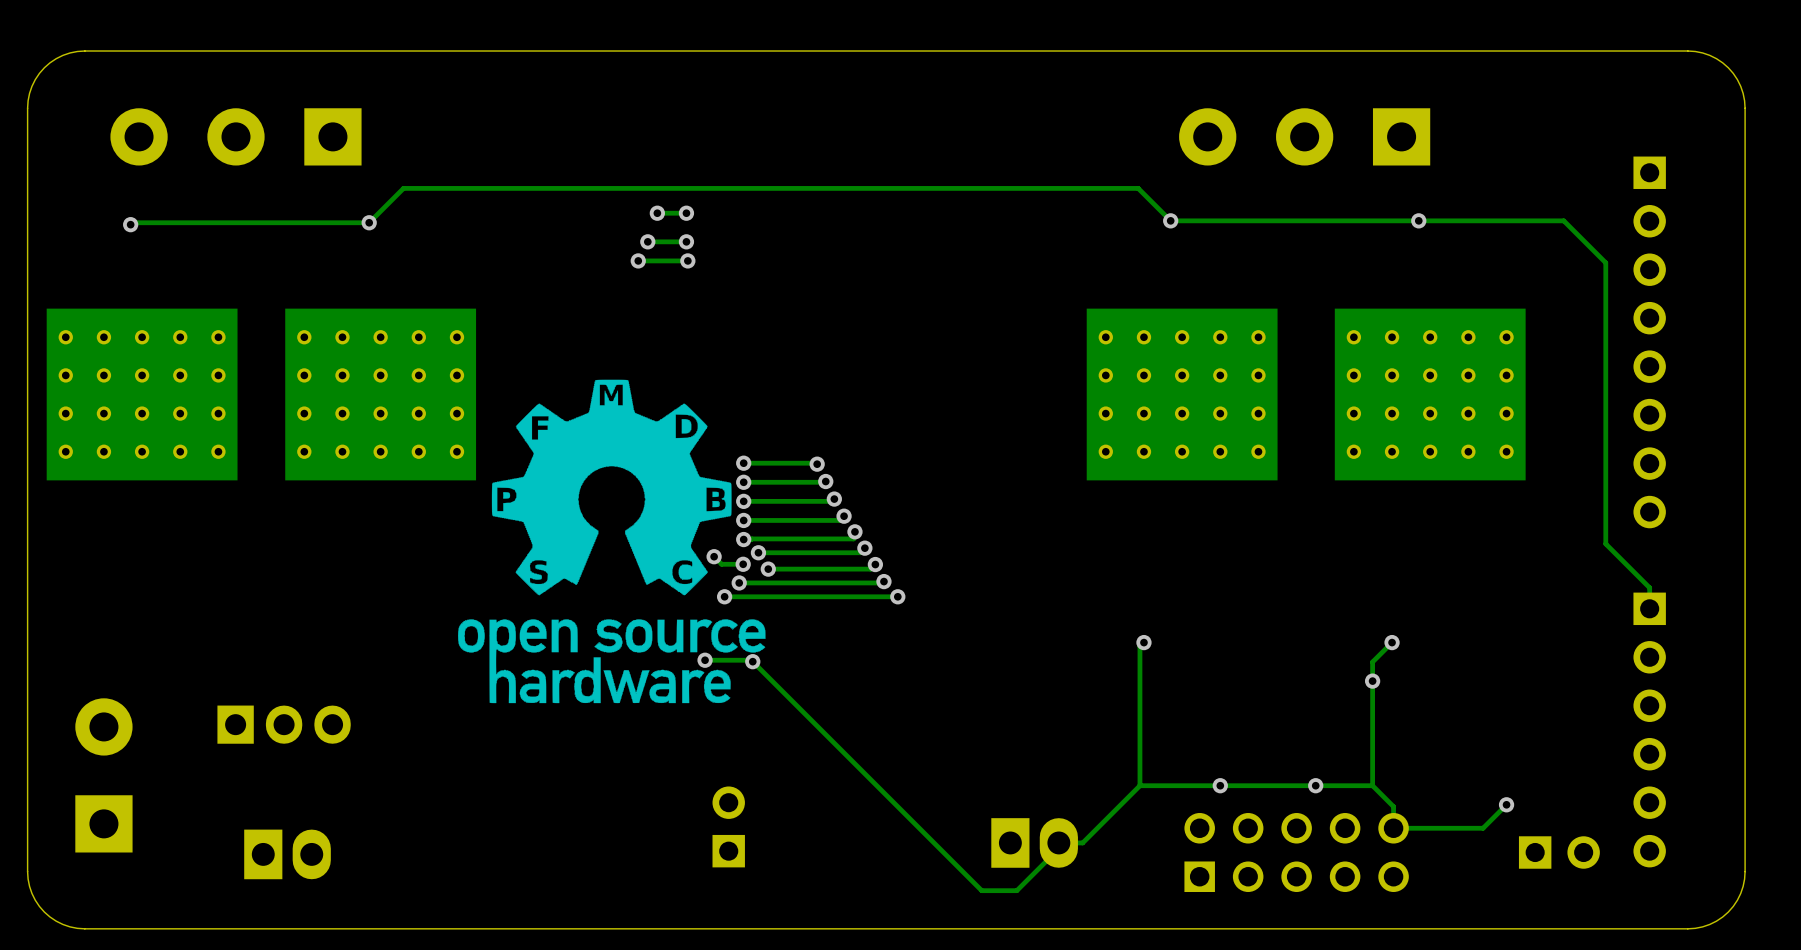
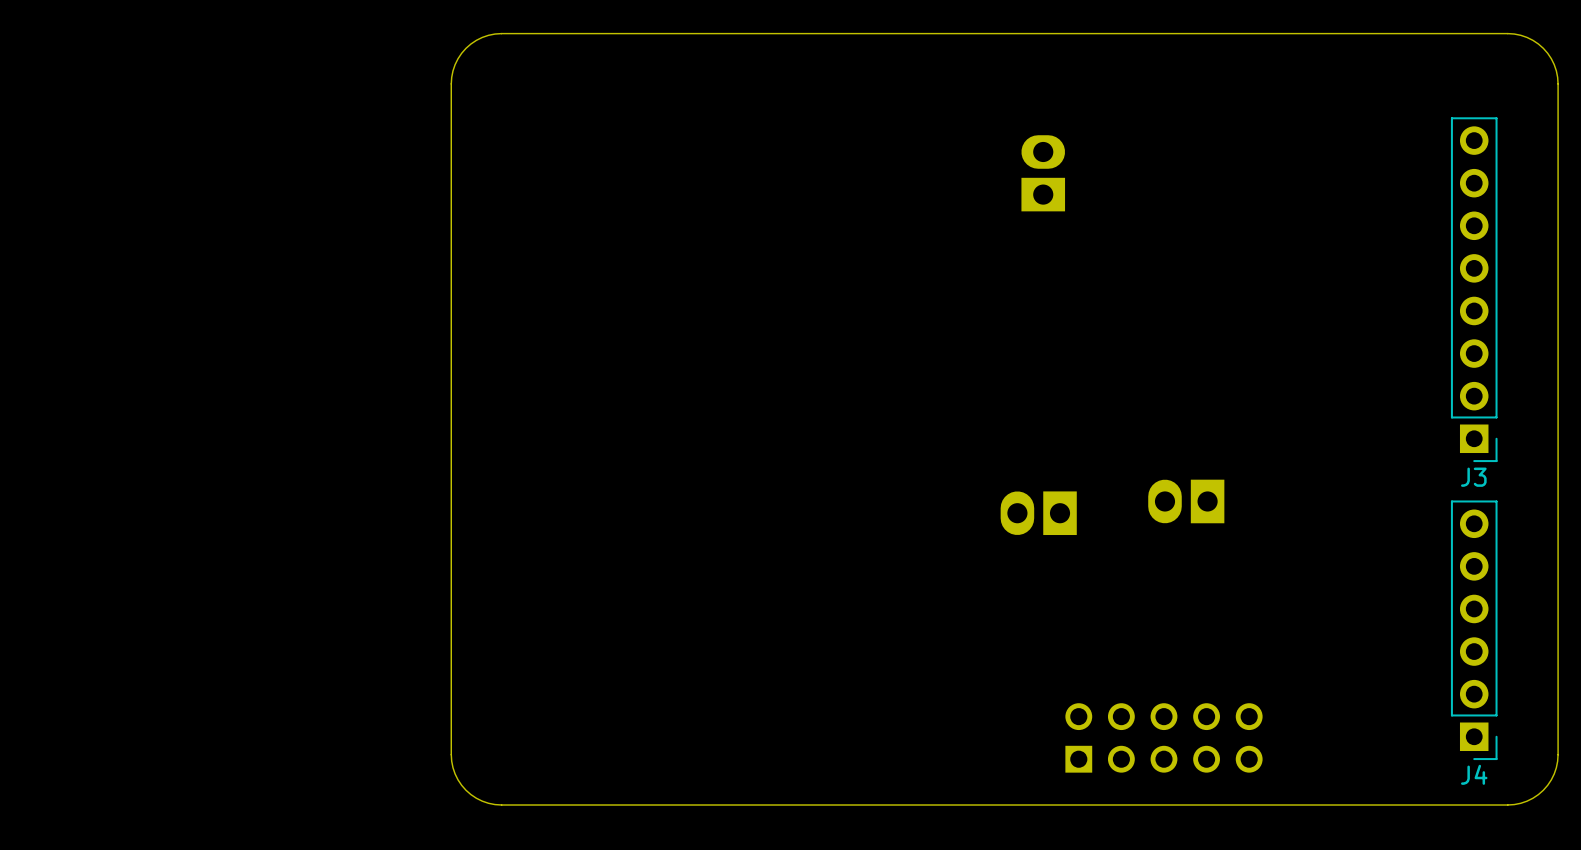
board edge: (542, 51) (77, 51) (56, 58) (44, 67) (31, 86) (27, 108) (27, 871) (29, 886) (35, 900) (44, 912) (56, 921) (70, 926) (84, 928) (542, 928) -> (501, 33) (482, 37) (466, 48) (455, 64) (451, 83) (451, 761) (455, 773) (466, 790) (482, 801) (501, 805)
part: (235, 136) -> none
part: (1304, 136) -> none
part: none -> (1043, 173)
via: (657, 213) -> none
track: (686, 213) (657, 213) -> none
via: (686, 213) -> none
via: (1170, 220) -> none
via: (1418, 220) -> none
via: (369, 222) -> none
track: (130, 224) (132, 222) (369, 222) (403, 188) (1138, 188) (1170, 220) (1563, 220) (1605, 262) (1605, 543) (1649, 587) (1649, 608) -> none
via: (130, 224) -> none
via: (647, 241) -> none
track: (686, 241) (647, 241) -> none
via: (686, 241) -> none
via: (638, 260) -> none
track: (687, 260) (638, 260) -> none
via: (687, 260) -> none
J3 side: top (1649, 342) -> bottom (1474, 289)
drawing: [458, 379, 766, 704] -> none
part: (142, 394) -> none
part: (380, 394) -> none
part: (1182, 394) -> none
part: (1430, 394) -> none
track: (743, 463) (817, 464) -> none
via: (743, 463) -> none
via: (817, 464) -> none
track: (825, 481) (743, 482) -> none
via: (825, 481) -> none
via: (743, 482) -> none
track: (834, 499) (832, 501) (743, 501) -> none
via: (834, 499) -> none
via: (743, 501) -> none
track: (844, 516) (839, 520) (743, 520) -> none
via: (844, 516) -> none
via: (743, 520) -> none
track: (854, 531) (853, 538) (743, 539) -> none
via: (854, 531) -> none
via: (743, 539) -> none
track: (864, 548) (860, 552) (758, 552) -> none
via: (864, 548) -> none
via: (758, 552) -> none
track: (714, 556) (721, 564) (743, 564) -> none
via: (714, 556) -> none
via: (743, 564) -> none
track: (875, 564) (870, 569) (768, 569) -> none
via: (875, 564) -> none
via: (768, 569) -> none
track: (883, 581) (739, 582) -> none
via: (883, 581) -> none
via: (739, 582) -> none
part: none -> (1186, 501)
via: (724, 596) -> none
track: (897, 596) (724, 596) -> none
via: (897, 596) -> none
part: none -> (1038, 513)
track: (1143, 642) (1139, 646) (1139, 785) -> none
via: (1143, 642) -> none
track: (1392, 642) (1372, 662) (1372, 785) -> none
via: (1392, 642) -> none
track: (705, 660) (751, 660) (981, 890) (1016, 890) (1058, 848) (1058, 842) (1082, 842) (1139, 785) -> none
via: (705, 660) -> none
via: (752, 661) -> none
via: (1372, 681) -> none
part: (284, 724) -> none
J4 side: top (1649, 729) -> bottom (1474, 630)
part: (103, 775) -> none
via: (1220, 785) -> none
via: (1315, 785) -> none
track: (1372, 785) (1393, 806) (1393, 828) (1483, 828) (1506, 804) -> none
track: (1372, 785) (1139, 785) -> none
via: (1506, 804) -> none
part: (728, 826) -> none
part: (1034, 842) -> none
part: (1559, 852) -> none
part: (287, 854) -> none

